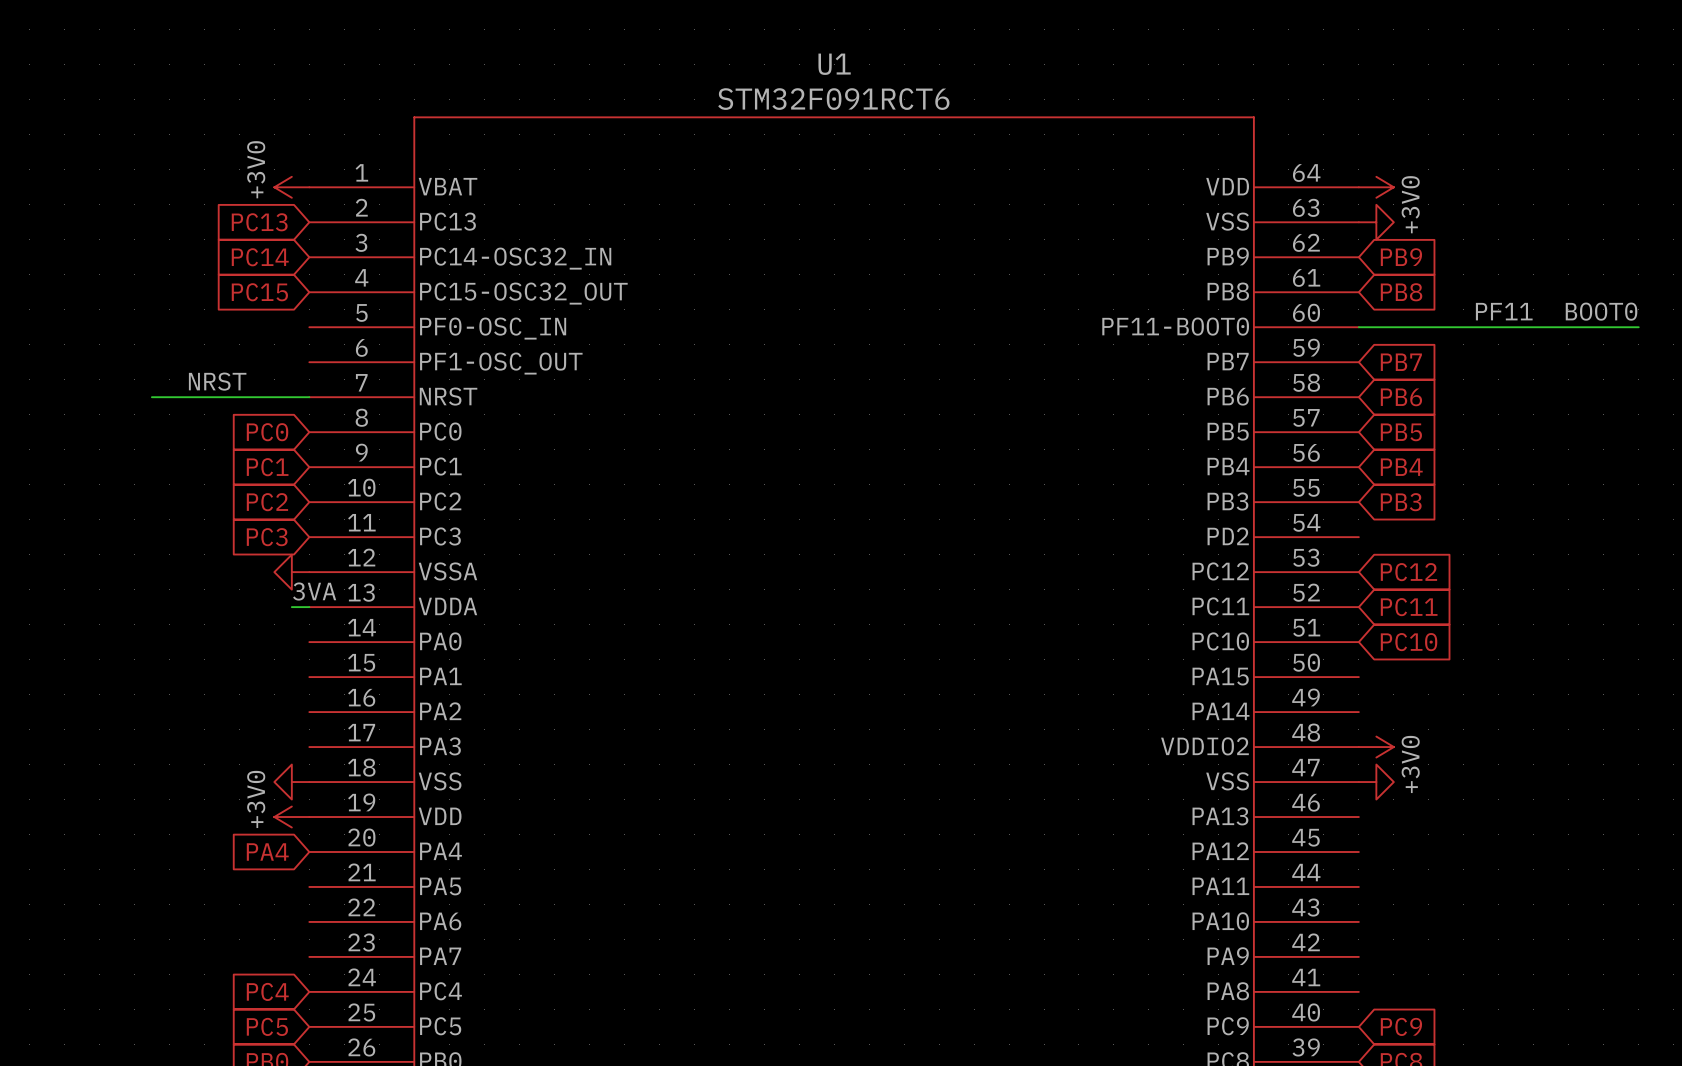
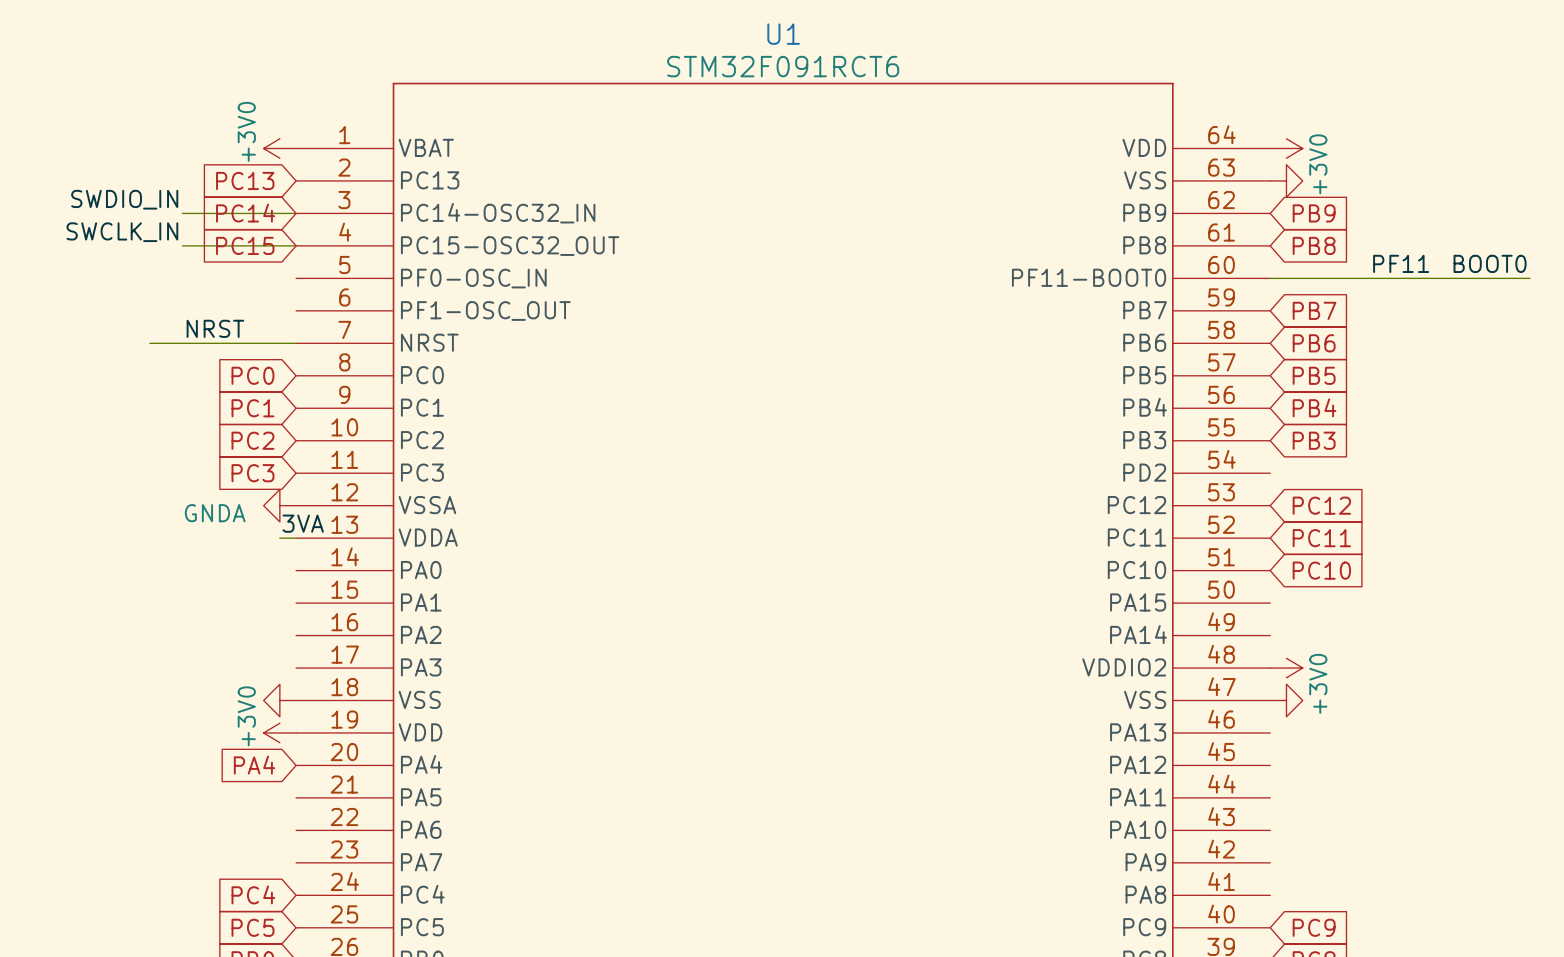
label: none -> SWDIO_IN (124, 199)
wire: none -> (182, 213) (296, 213)
label: none -> SWCLK_IN (122, 232)
wire: none -> (182, 245) (296, 245)
power symbol text: none -> GNDA (215, 513)

